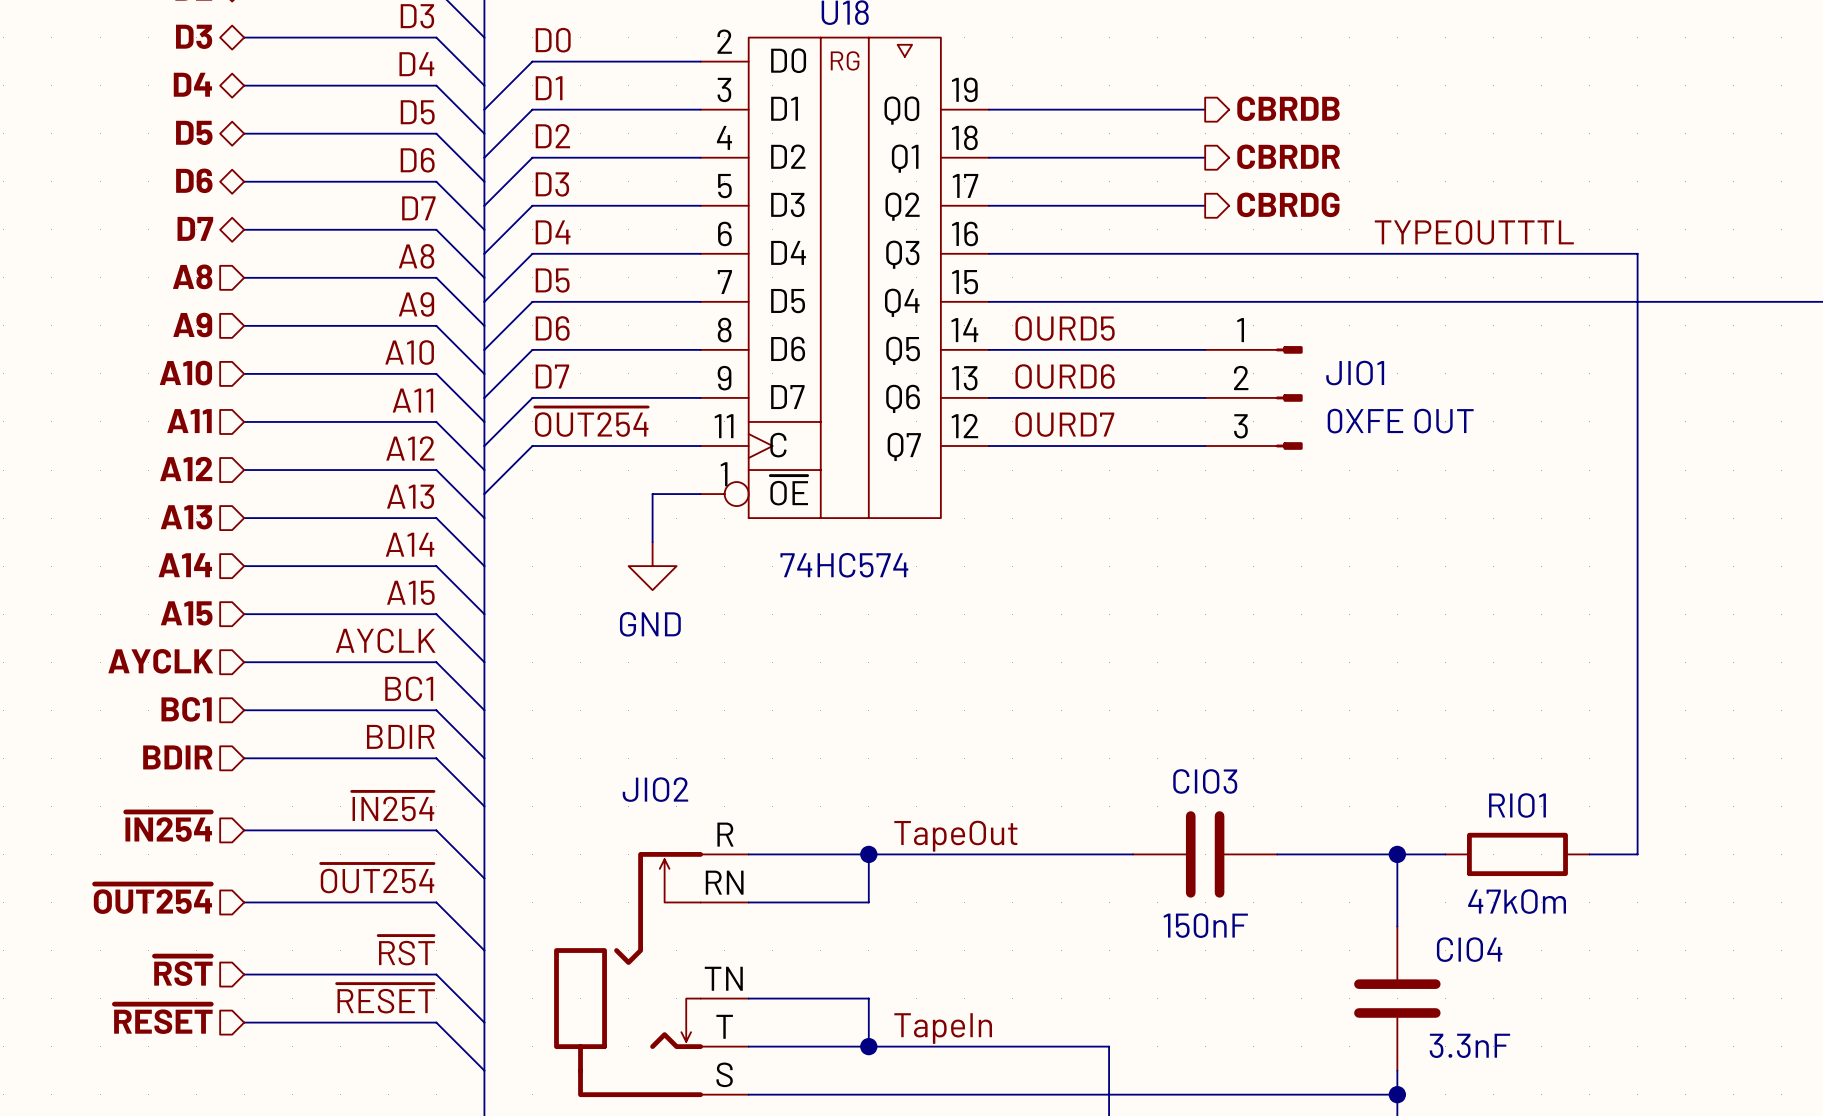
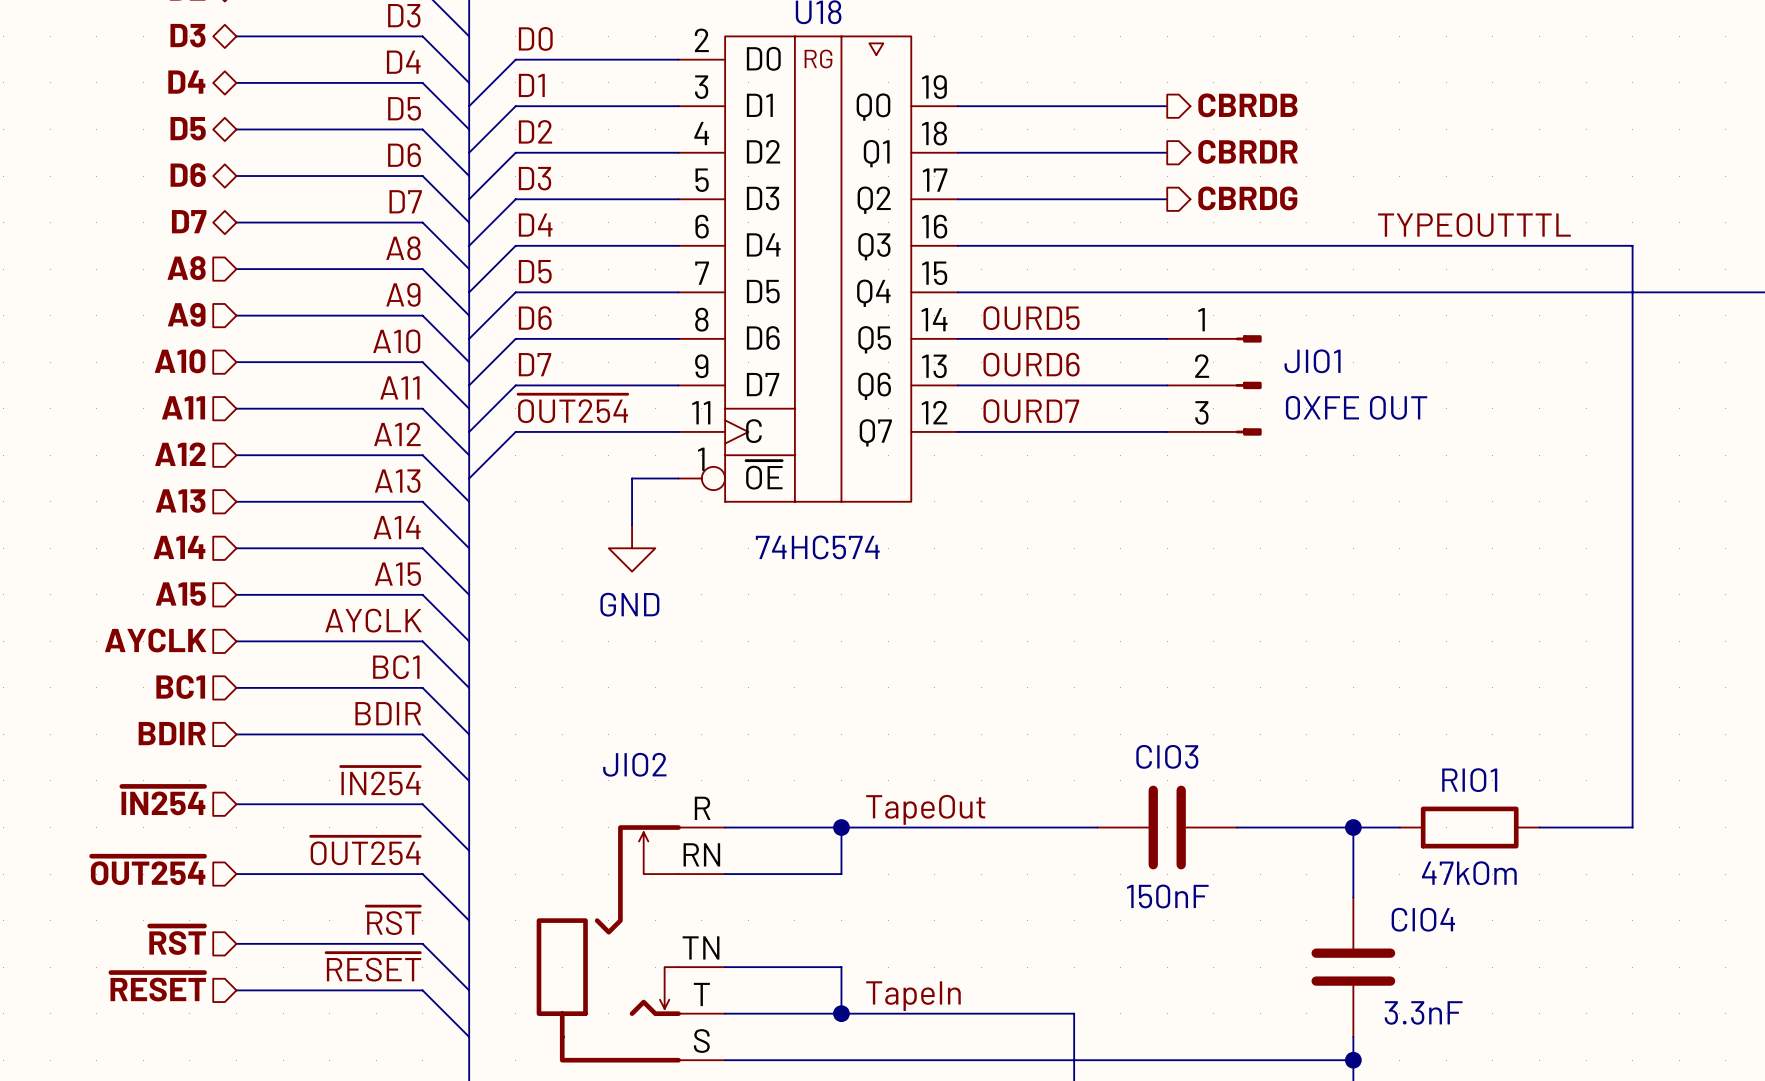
label position: TYPEOUTTTL (1474, 232) -> TYPEOUTTTL (1474, 225)
wire: (1637, 253) (1637, 854) -> (1586, 245) (1632, 245) (1632, 827) (1586, 827)

